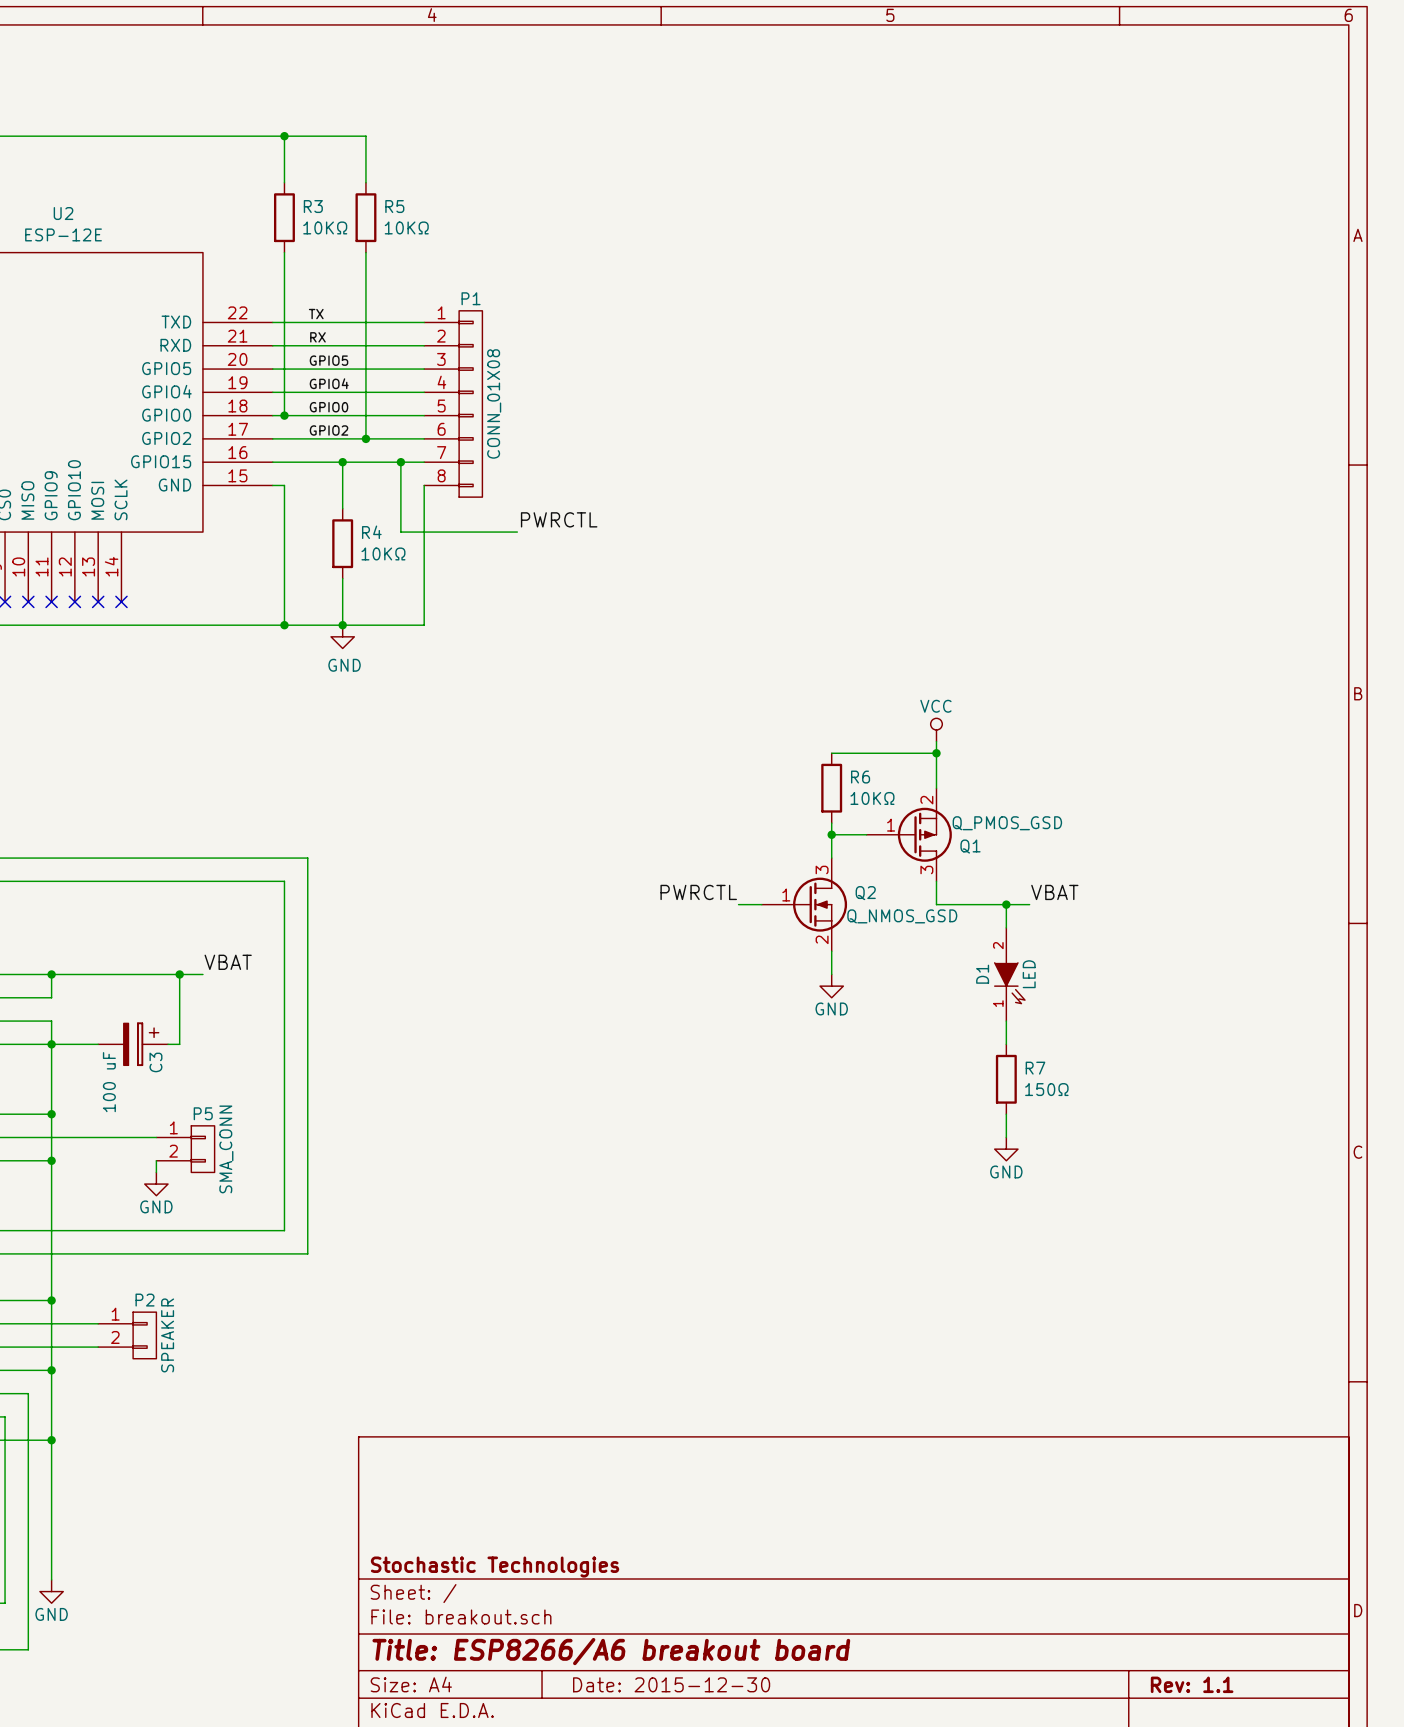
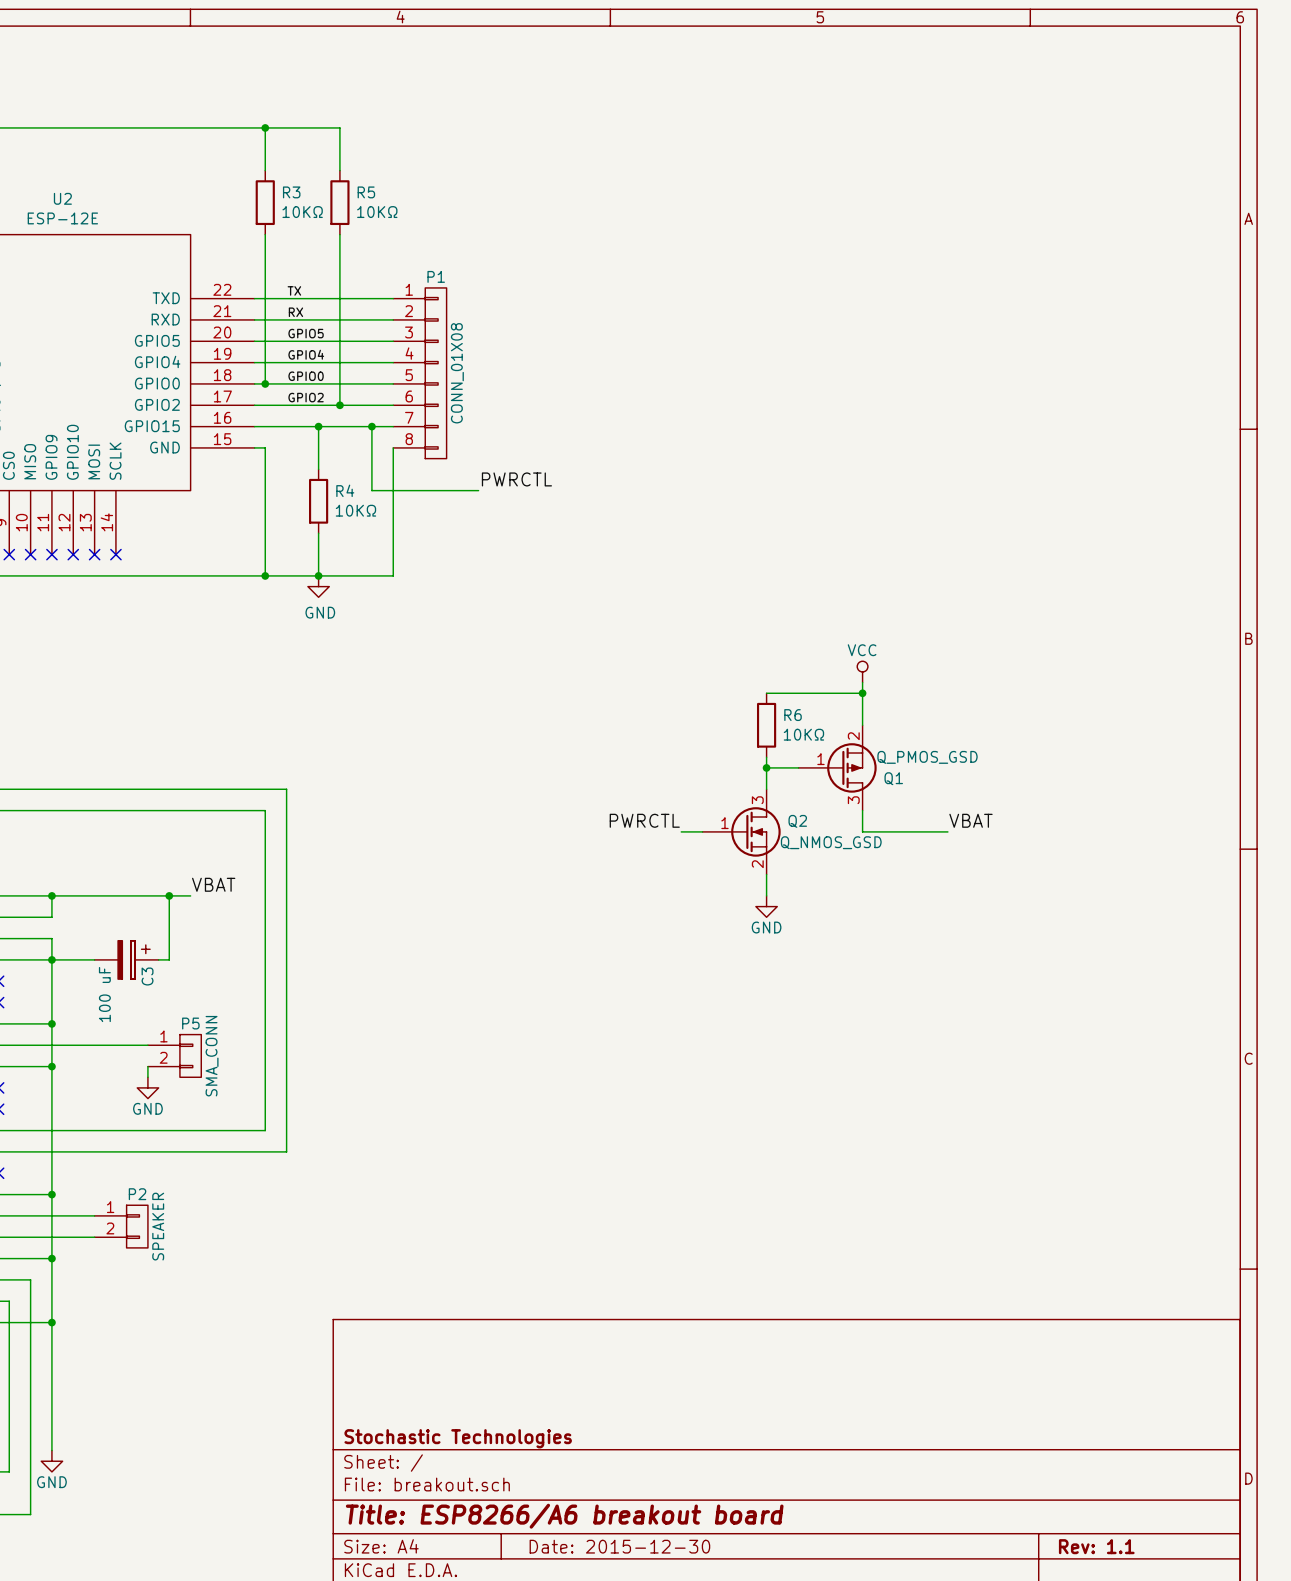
wire: (1006, 904) (1006, 927) -> none
junction: (1006, 904) -> none
D1: LED (1009, 974) -> none
wire: (1006, 1021) (1006, 1044) -> none
R7: 150Ω (1006, 1079) -> none
wire: (1006, 1114) (1006, 1137) -> none
power symbol: GND (1006, 1149) -> none

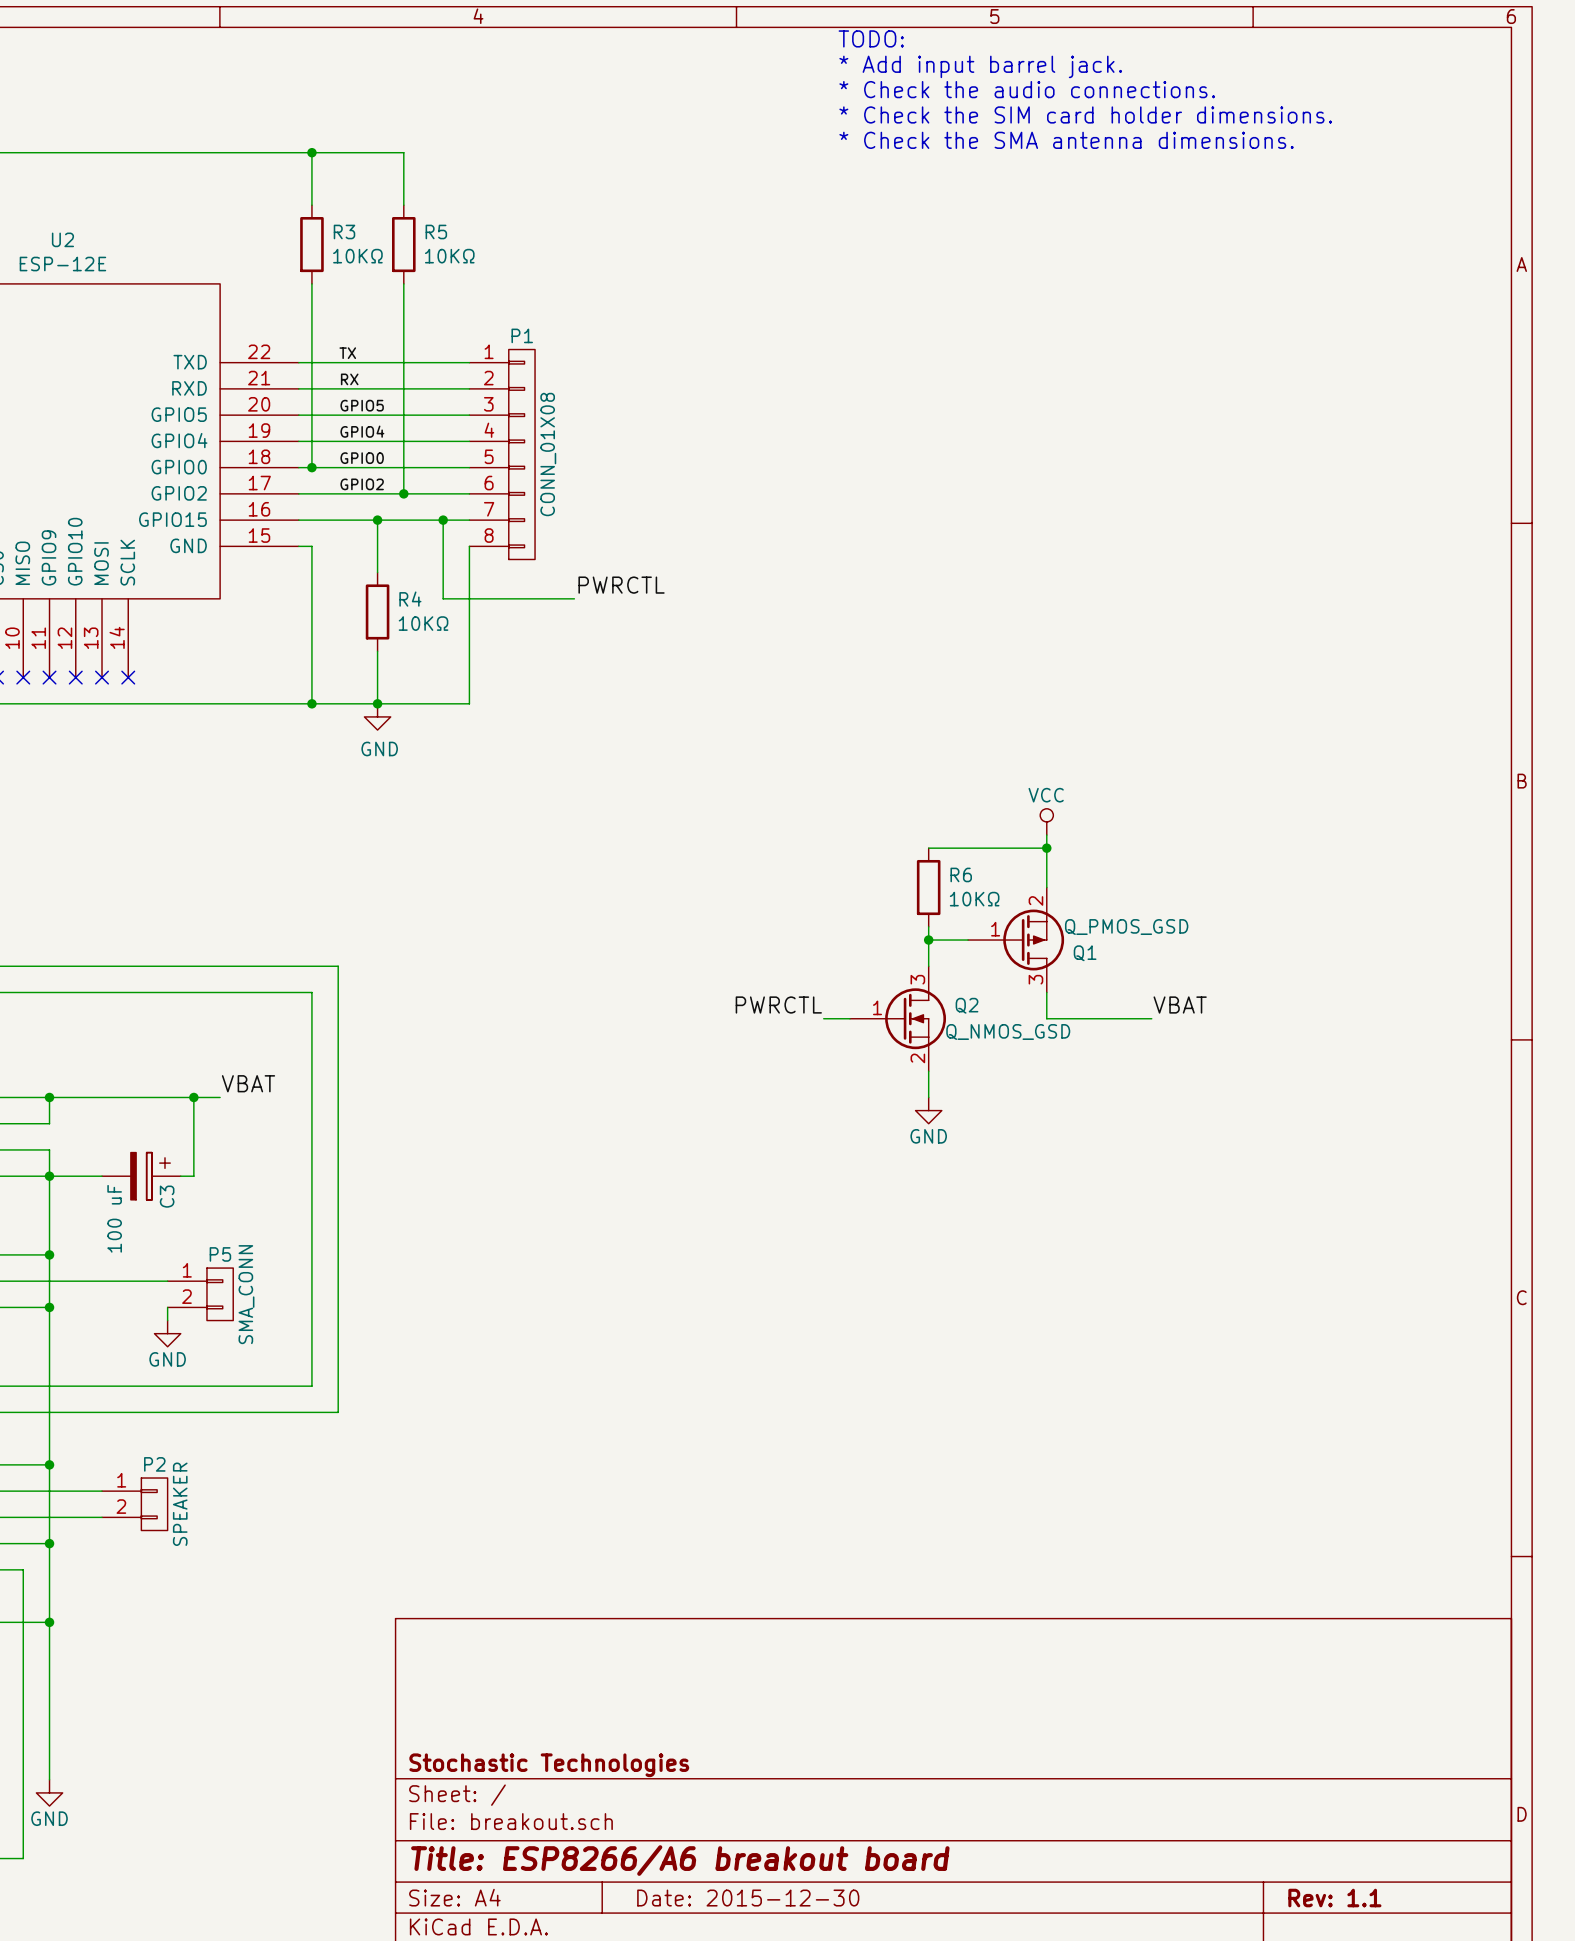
text: none -> TODO: (871, 38)
text: none -> * Add input barrel jack. (980, 66)
text: none -> * Check the audio connections. (1027, 89)
text: none -> * Check the SIM card holder dimensions. (1085, 114)
text: none -> * Check the SMA antenna dimensions. (1066, 140)

